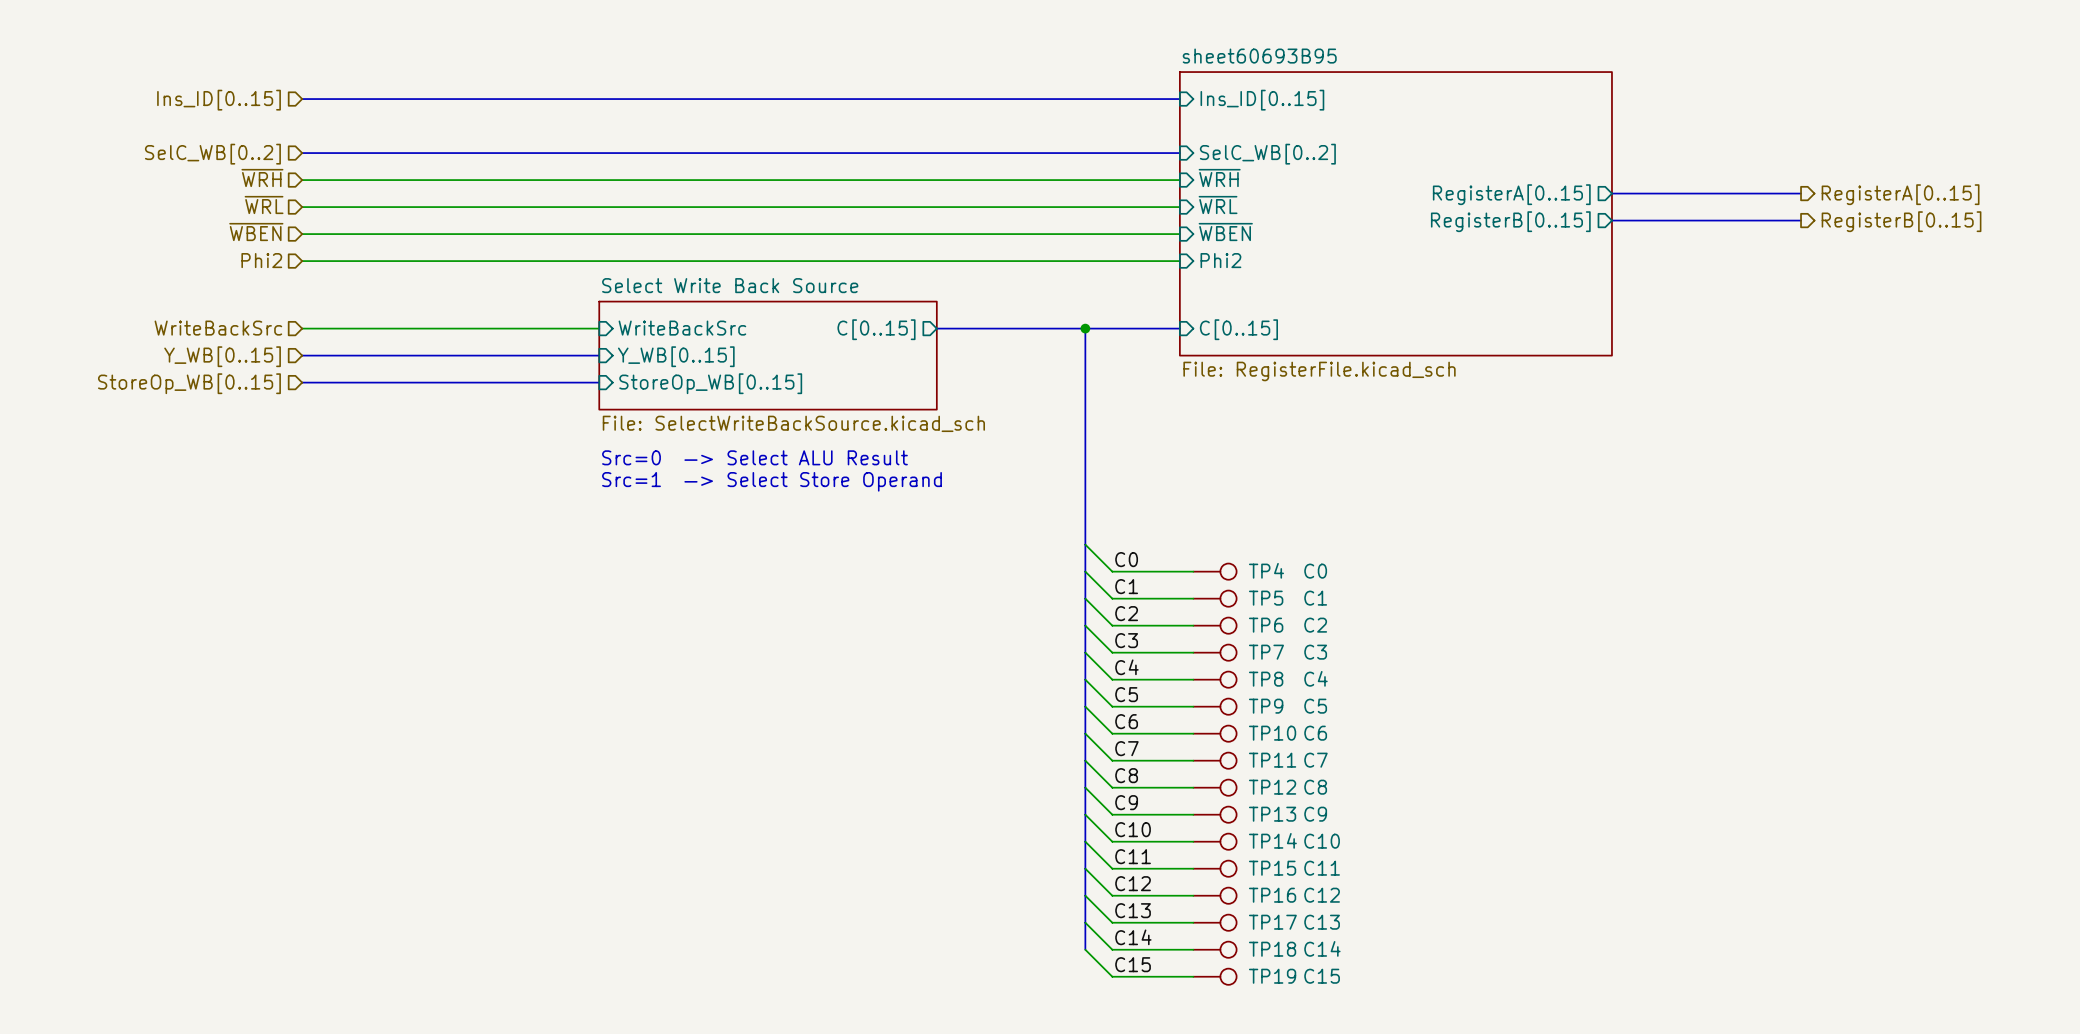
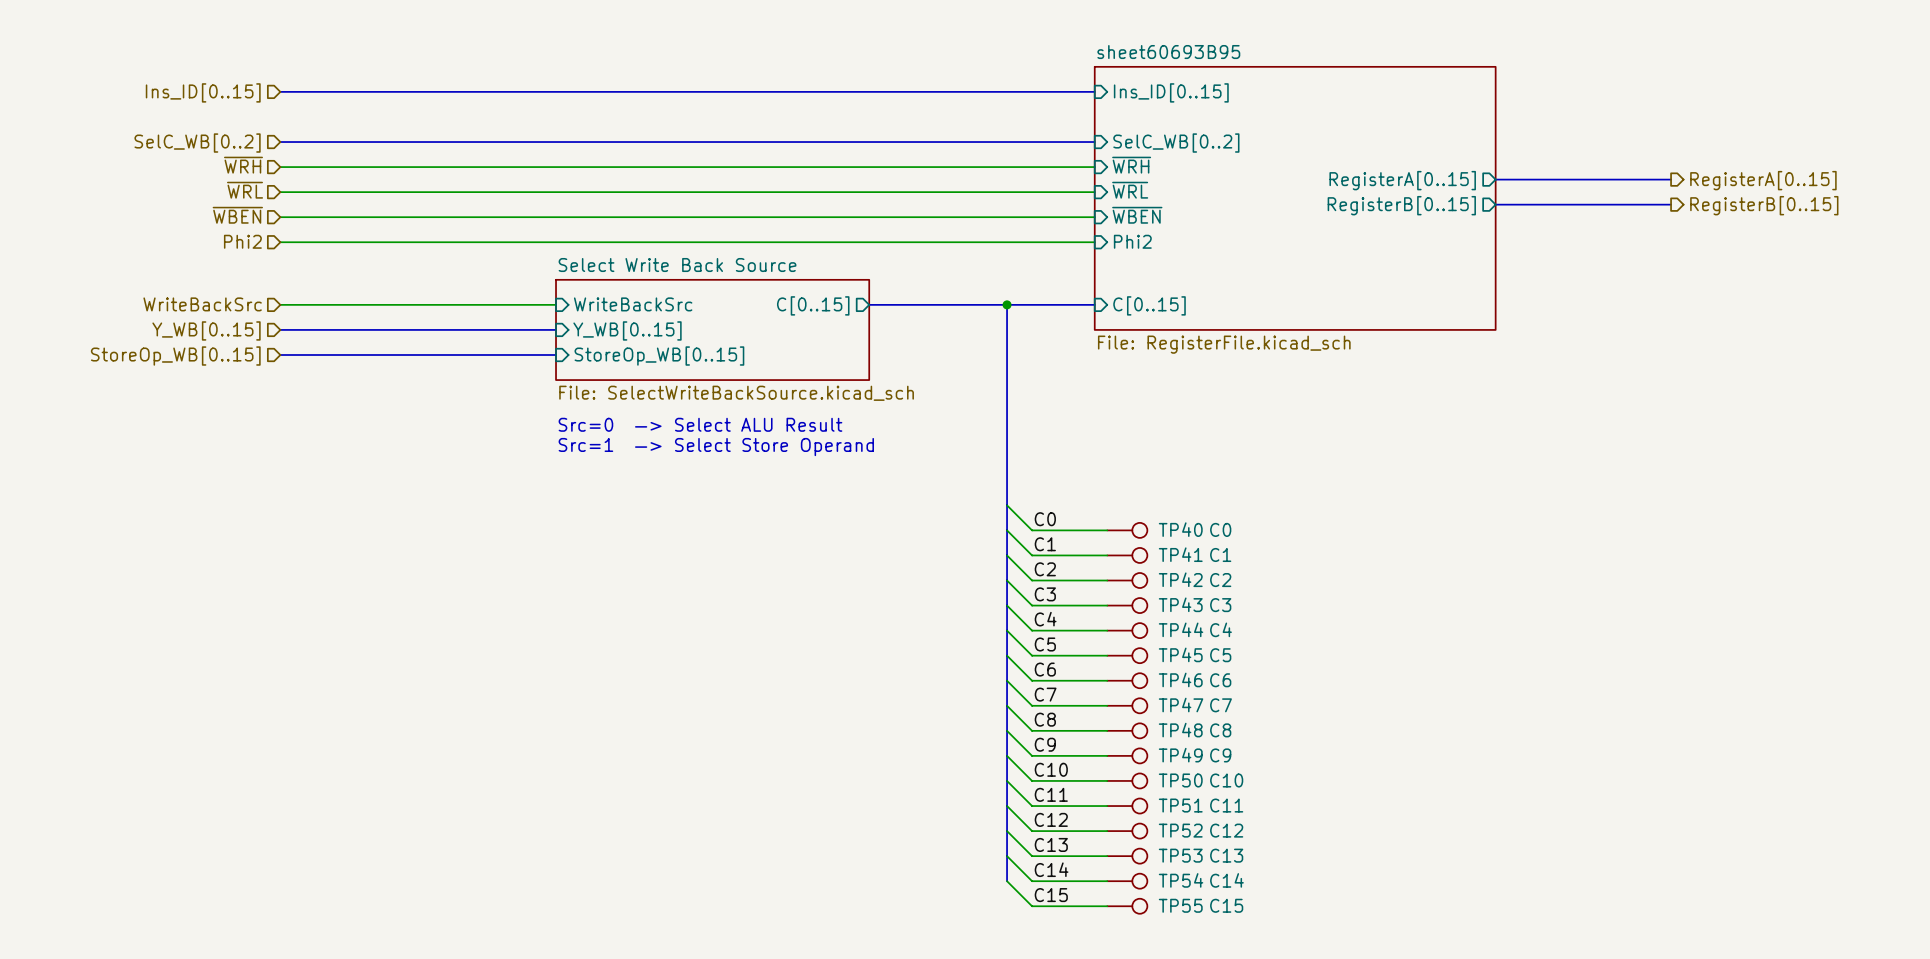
TP4 name: TP4 (1266, 570) -> TP40 (1180, 529)
TP5 name: TP5 (1266, 598) -> TP41 (1180, 554)
TP6 name: TP6 (1266, 625) -> TP42 (1180, 579)
TP7 name: TP7 (1266, 652) -> TP43 (1180, 604)
TP8 name: TP8 (1266, 679) -> TP44 (1181, 629)
TP9 name: TP9 (1266, 706) -> TP45 (1180, 654)
TP10 name: TP10 (1272, 733) -> TP46 (1180, 679)
TP11 name: TP11 (1272, 760) -> TP47 (1181, 705)
TP12 name: TP12 (1272, 787) -> TP48 (1180, 730)
TP13 name: TP13 (1272, 814) -> TP49 (1180, 755)
TP14 name: TP14 (1272, 840) -> TP50 (1180, 780)
TP15 name: TP15 (1272, 868) -> TP51 (1180, 805)
TP16 name: TP16 (1272, 895) -> TP52 (1180, 830)
TP17 name: TP17 (1272, 922) -> TP53 (1180, 855)
TP18 name: TP18 (1272, 949) -> TP54 (1181, 880)
TP19 name: TP19 (1272, 976) -> TP55 (1180, 905)

